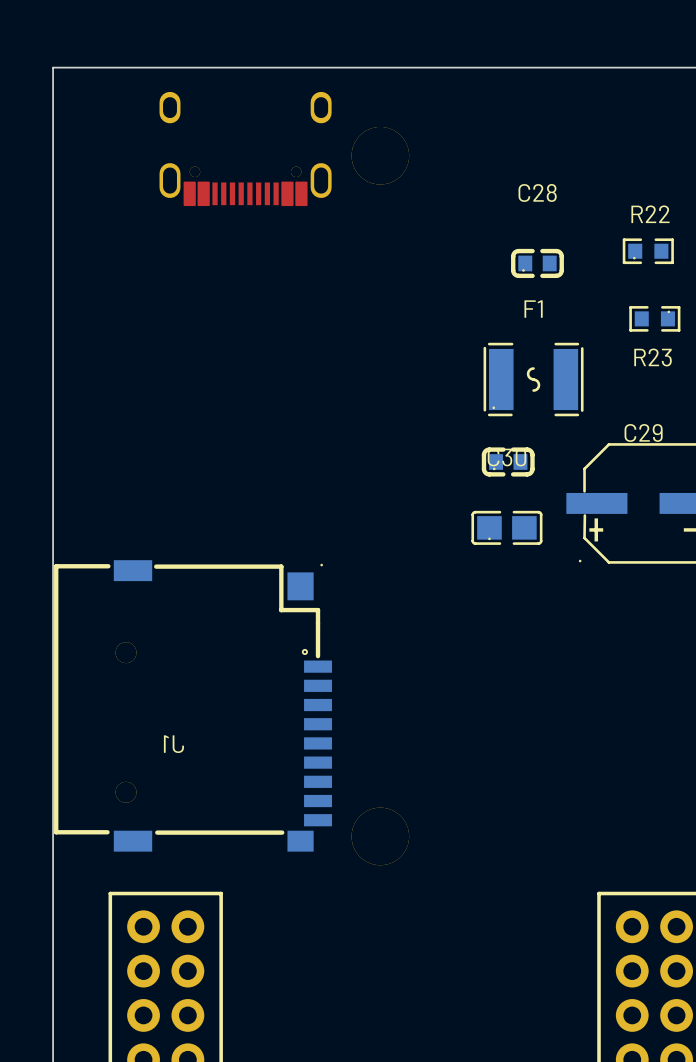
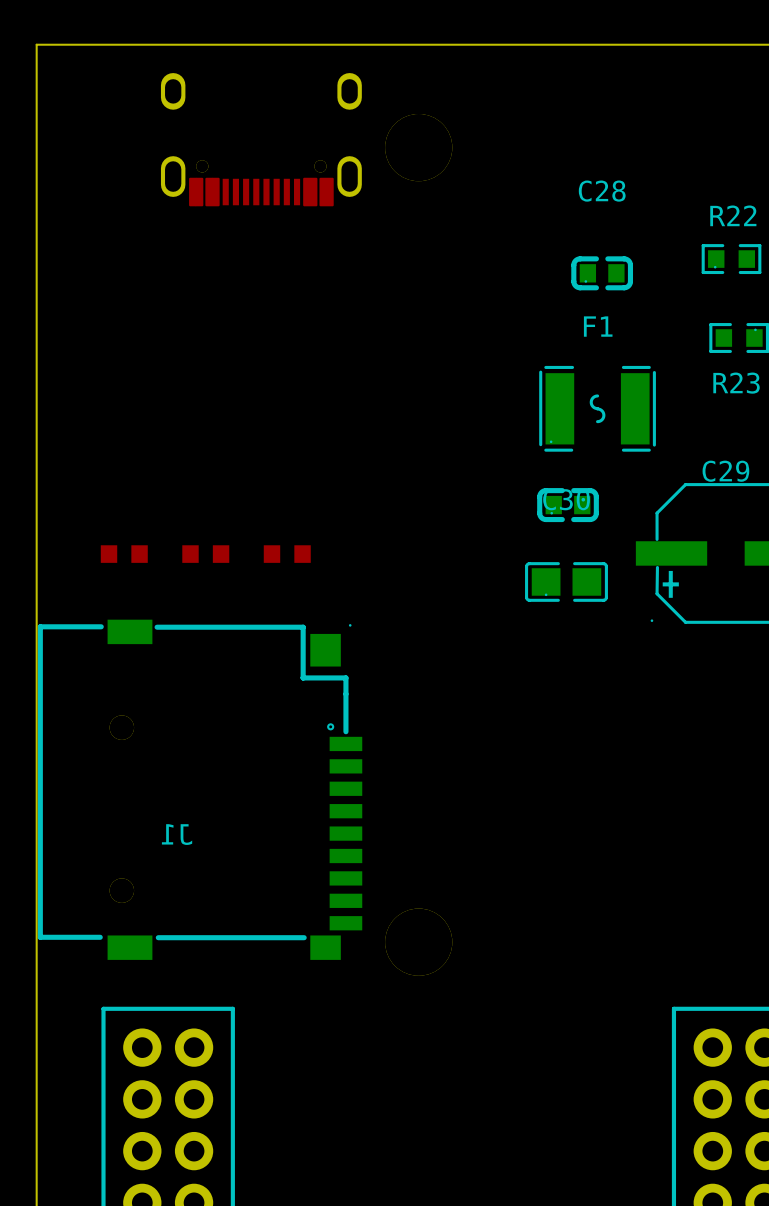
part: none -> (124, 554)
part: none -> (205, 554)
part: none -> (287, 554)

